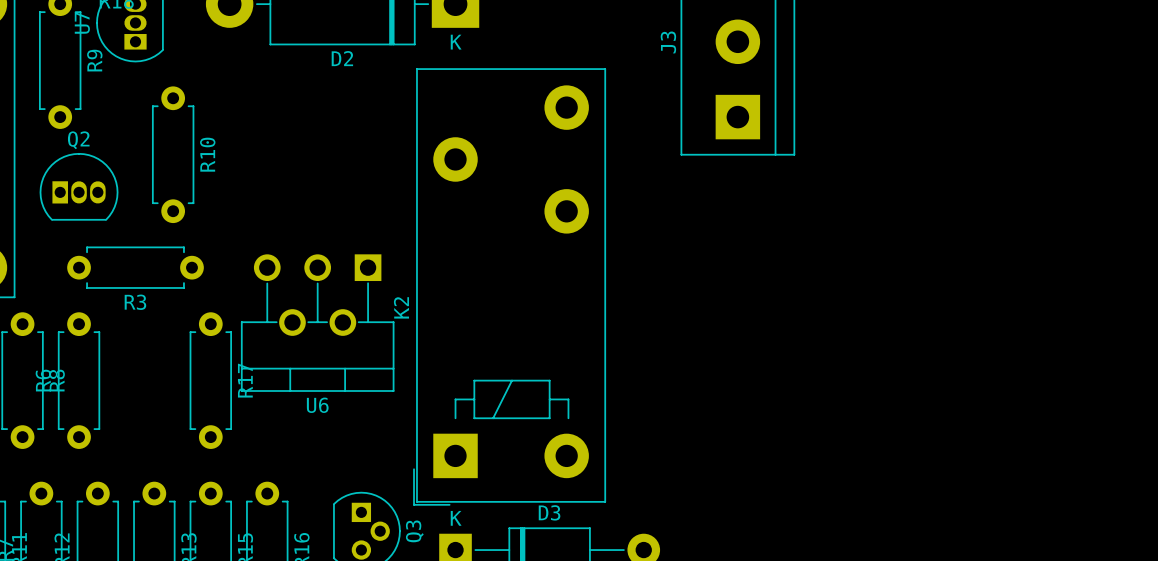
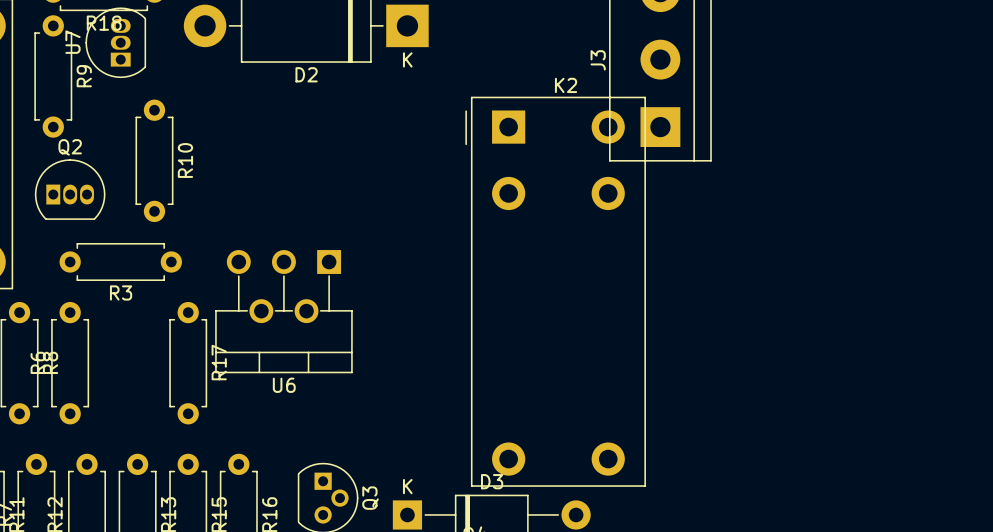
K2 footprint: [413, 68, 607, 506] -> [465, 96, 646, 487]
K2 name position: K2 (401, 307) -> K2 (566, 85)

